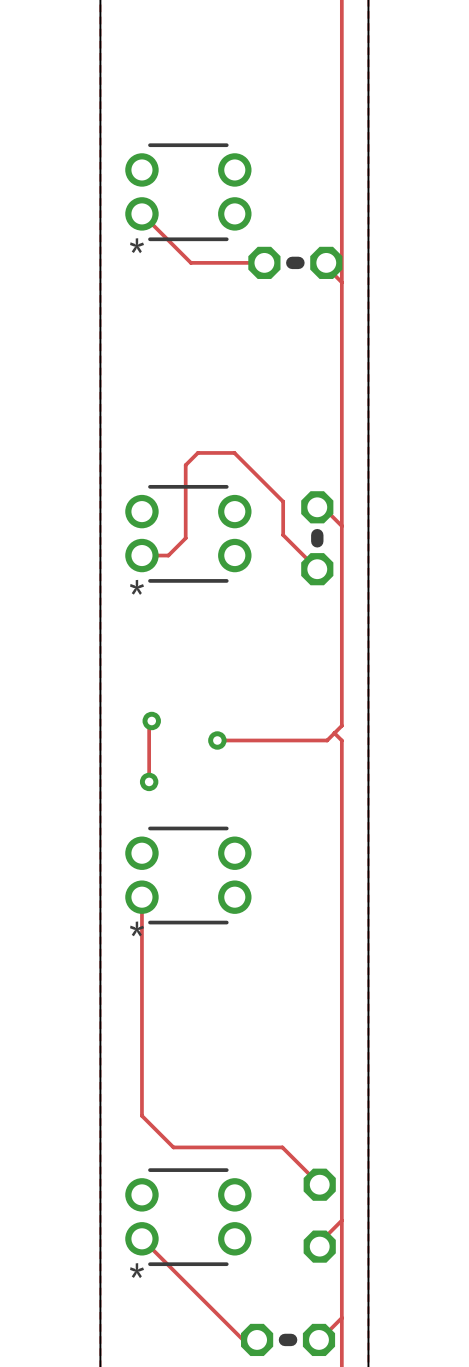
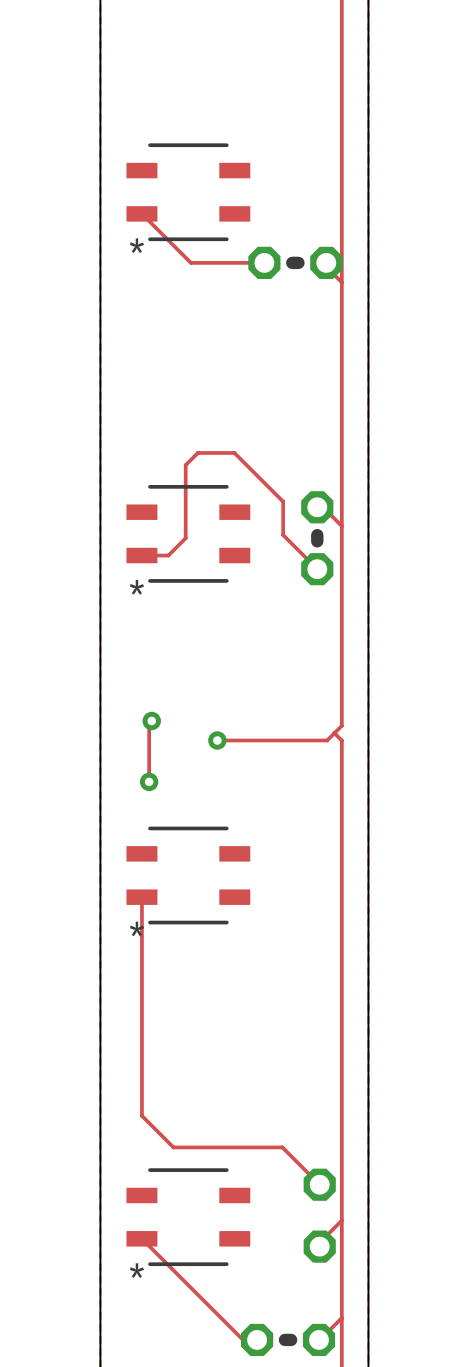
part footprint: [125, 143, 252, 242] -> [126, 143, 251, 242]
part footprint: [125, 484, 252, 583] -> [126, 484, 251, 583]
part footprint: [125, 826, 252, 925] -> [126, 826, 251, 925]
part footprint: [125, 1168, 252, 1267] -> [126, 1168, 251, 1267]

